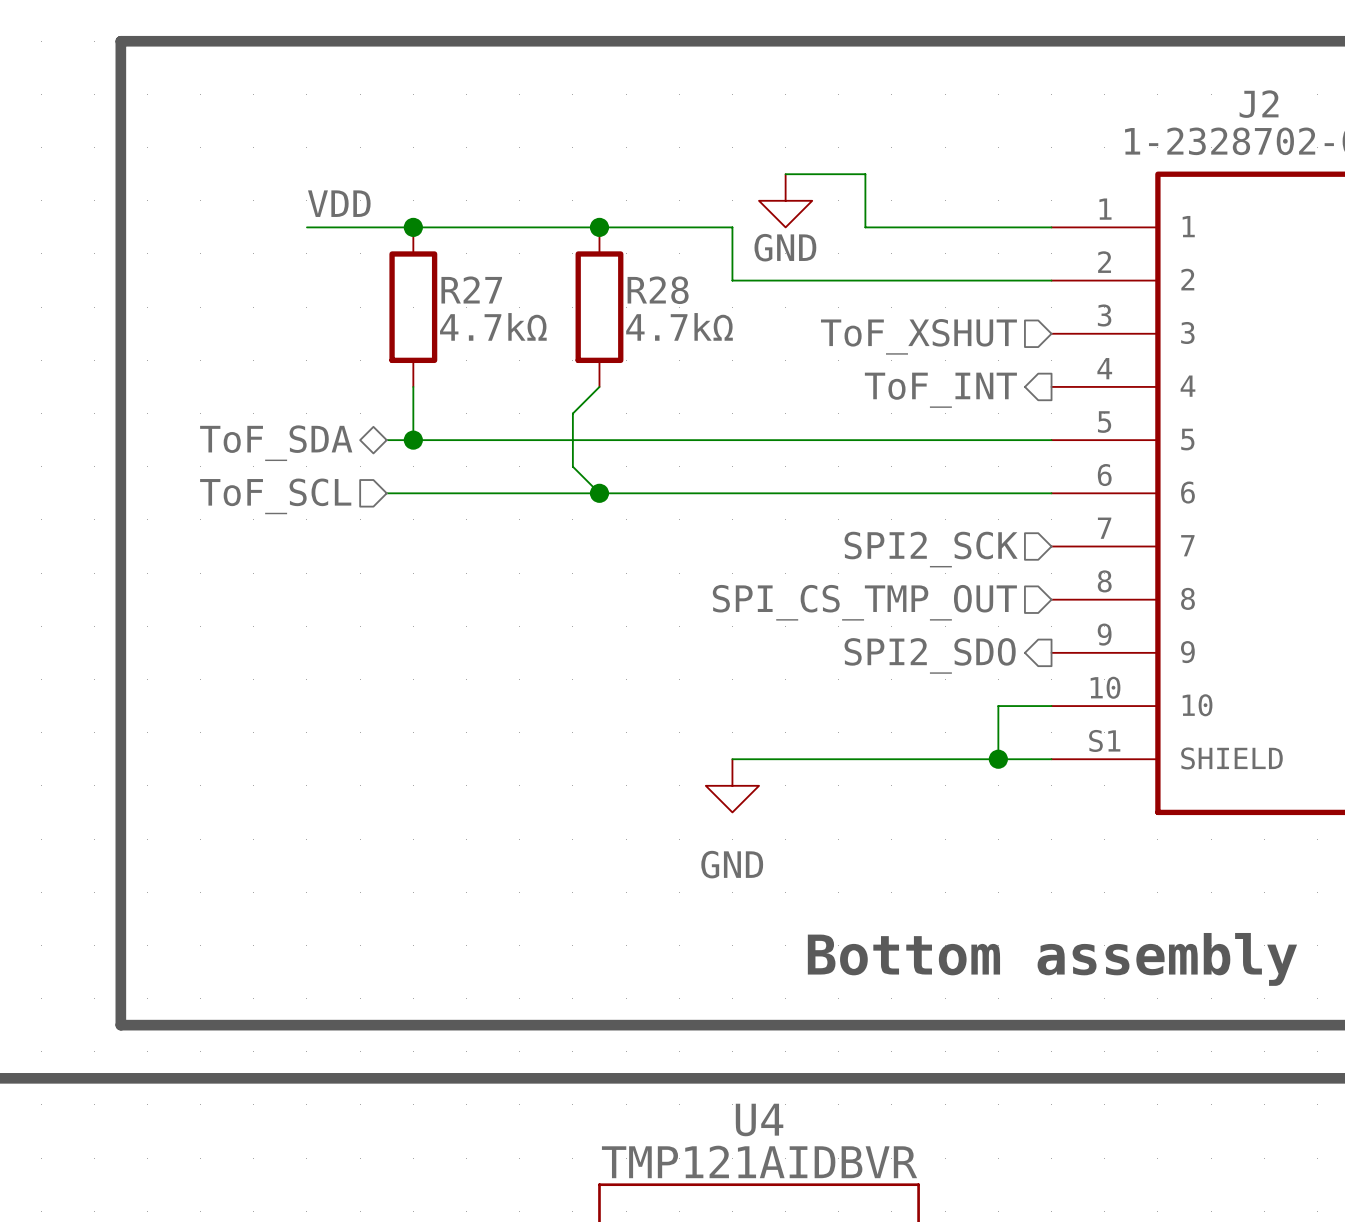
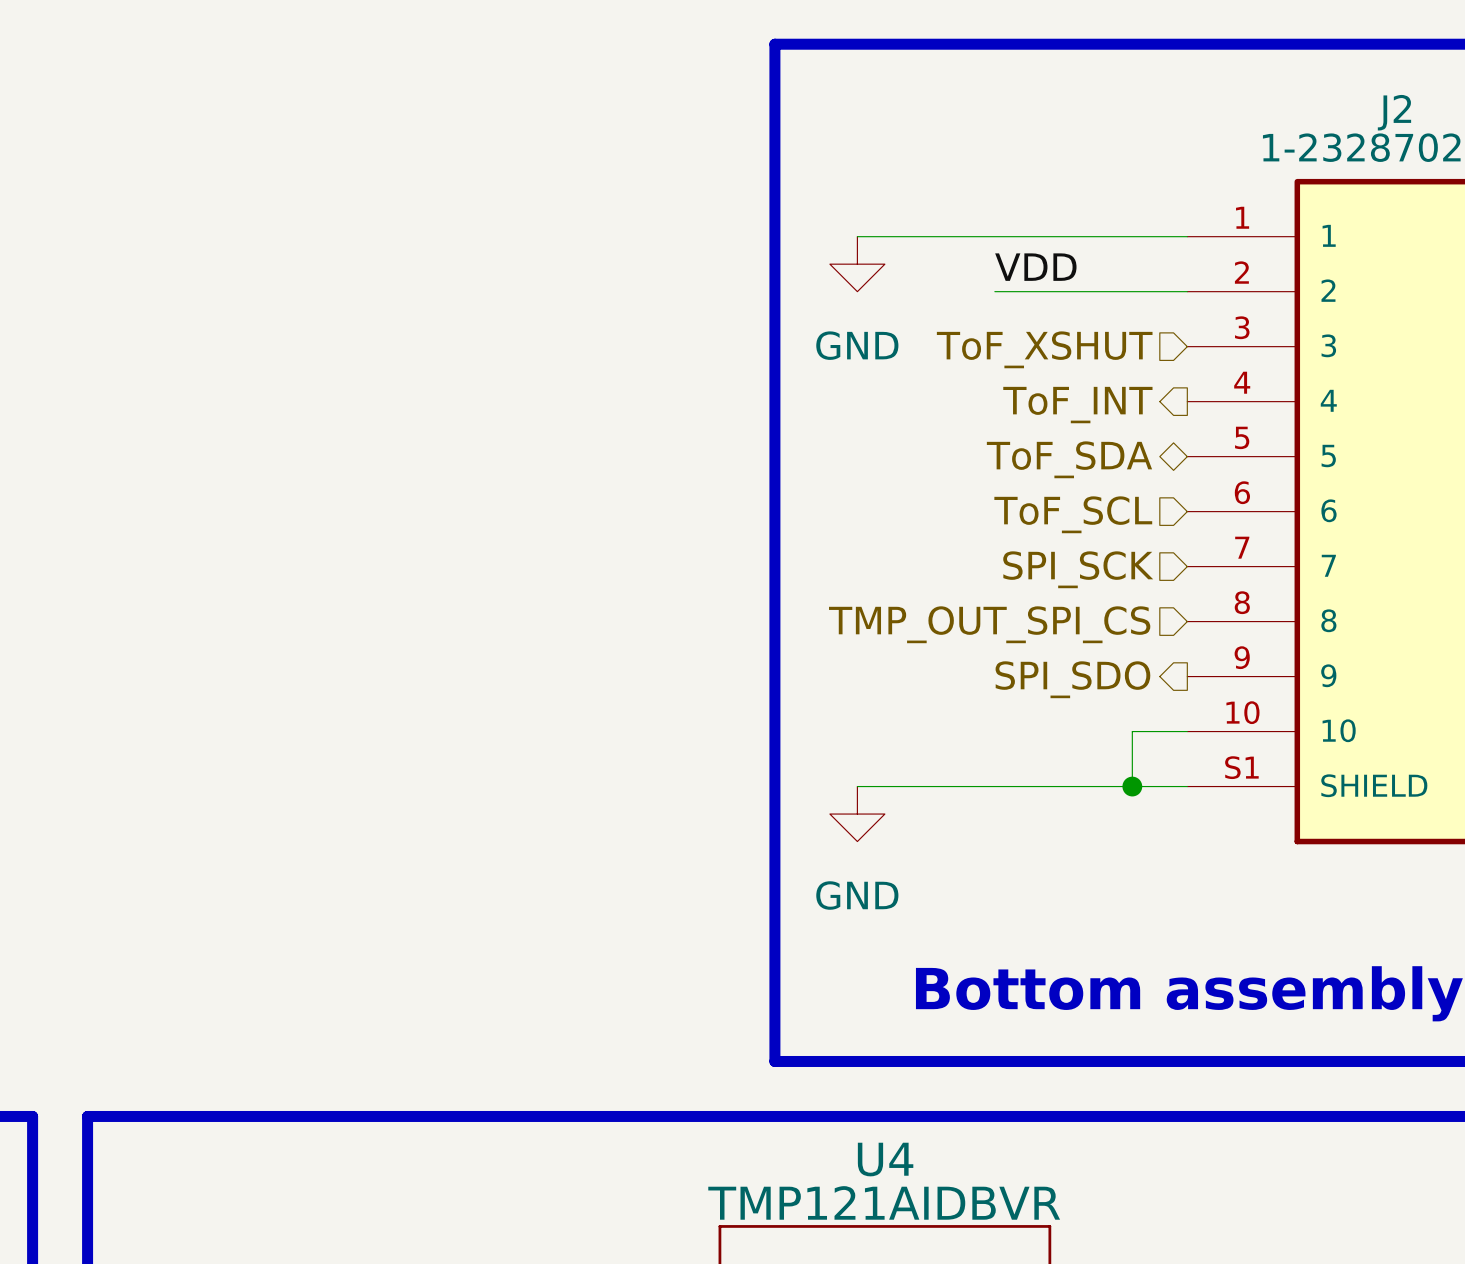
line: (652, 41) (120, 41) (120, 1025) (652, 1025) -> (774, 44) (774, 1061)
wire: (785, 174) (865, 174) (865, 227) -> (857, 236) (994, 236)
power symbol position: GND (785, 200) -> GND (857, 264)
label: VDD (339, 203) -> none
wire: (306, 227) (732, 227) (732, 280) (865, 280) -> none
junction: (413, 227) -> none
junction: (599, 227) -> none
power symbol text position: GND (785, 247) -> GND (857, 345)
label: none -> VDD (1035, 267)
R27: 4.7kΩ (413, 307) -> none
R28: 4.7kΩ (599, 307) -> none
wire: (413, 386) (413, 440) -> none
wire: (599, 386) (572, 413) (572, 466) (599, 493) -> none
wire: (386, 440) (1051, 440) -> none
junction: (413, 440) -> none
hierarchical label: ToF_SDA (276, 443) -> none
hierarchical label: none -> ToF_SDA (1069, 459)
wire: (386, 493) (1051, 493) -> none
junction: (599, 493) -> none
hierarchical label: ToF_SCL (275, 496) -> none
hierarchical label: none -> ToF_SCL (1073, 514)
hierarchical label: SPI2_SCK (931, 549) -> SPI_SCK (1078, 569)
hierarchical label: SPI_CS_TMP_OUT (864, 602) -> TMP_OUT_SPI_CS (989, 624)
hierarchical label: SPI2_SDO (930, 655) -> SPI_SDO (1072, 679)

